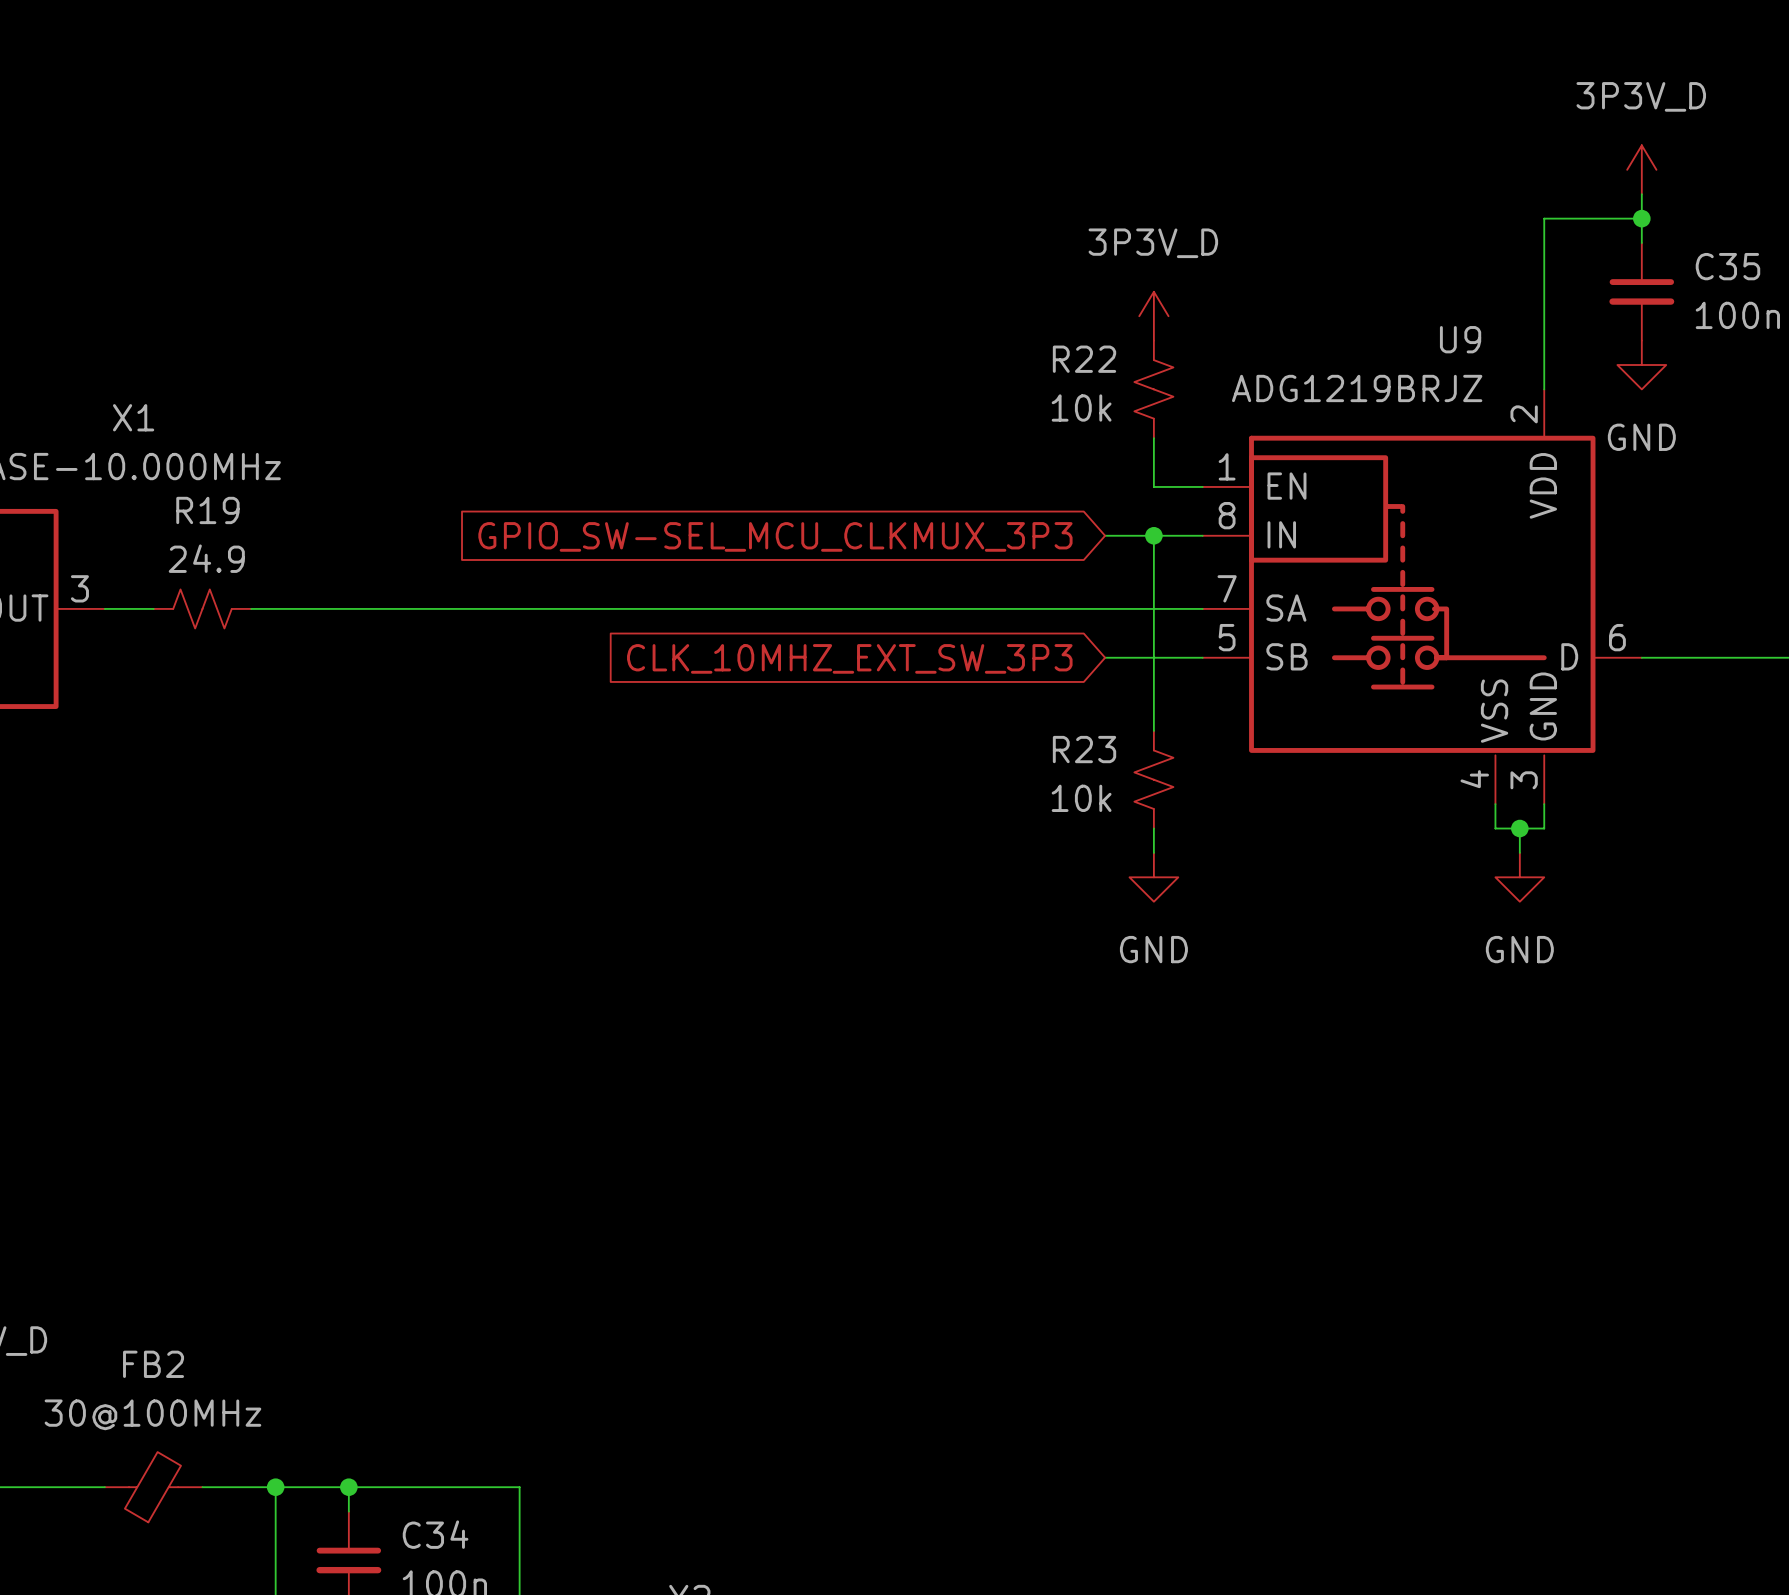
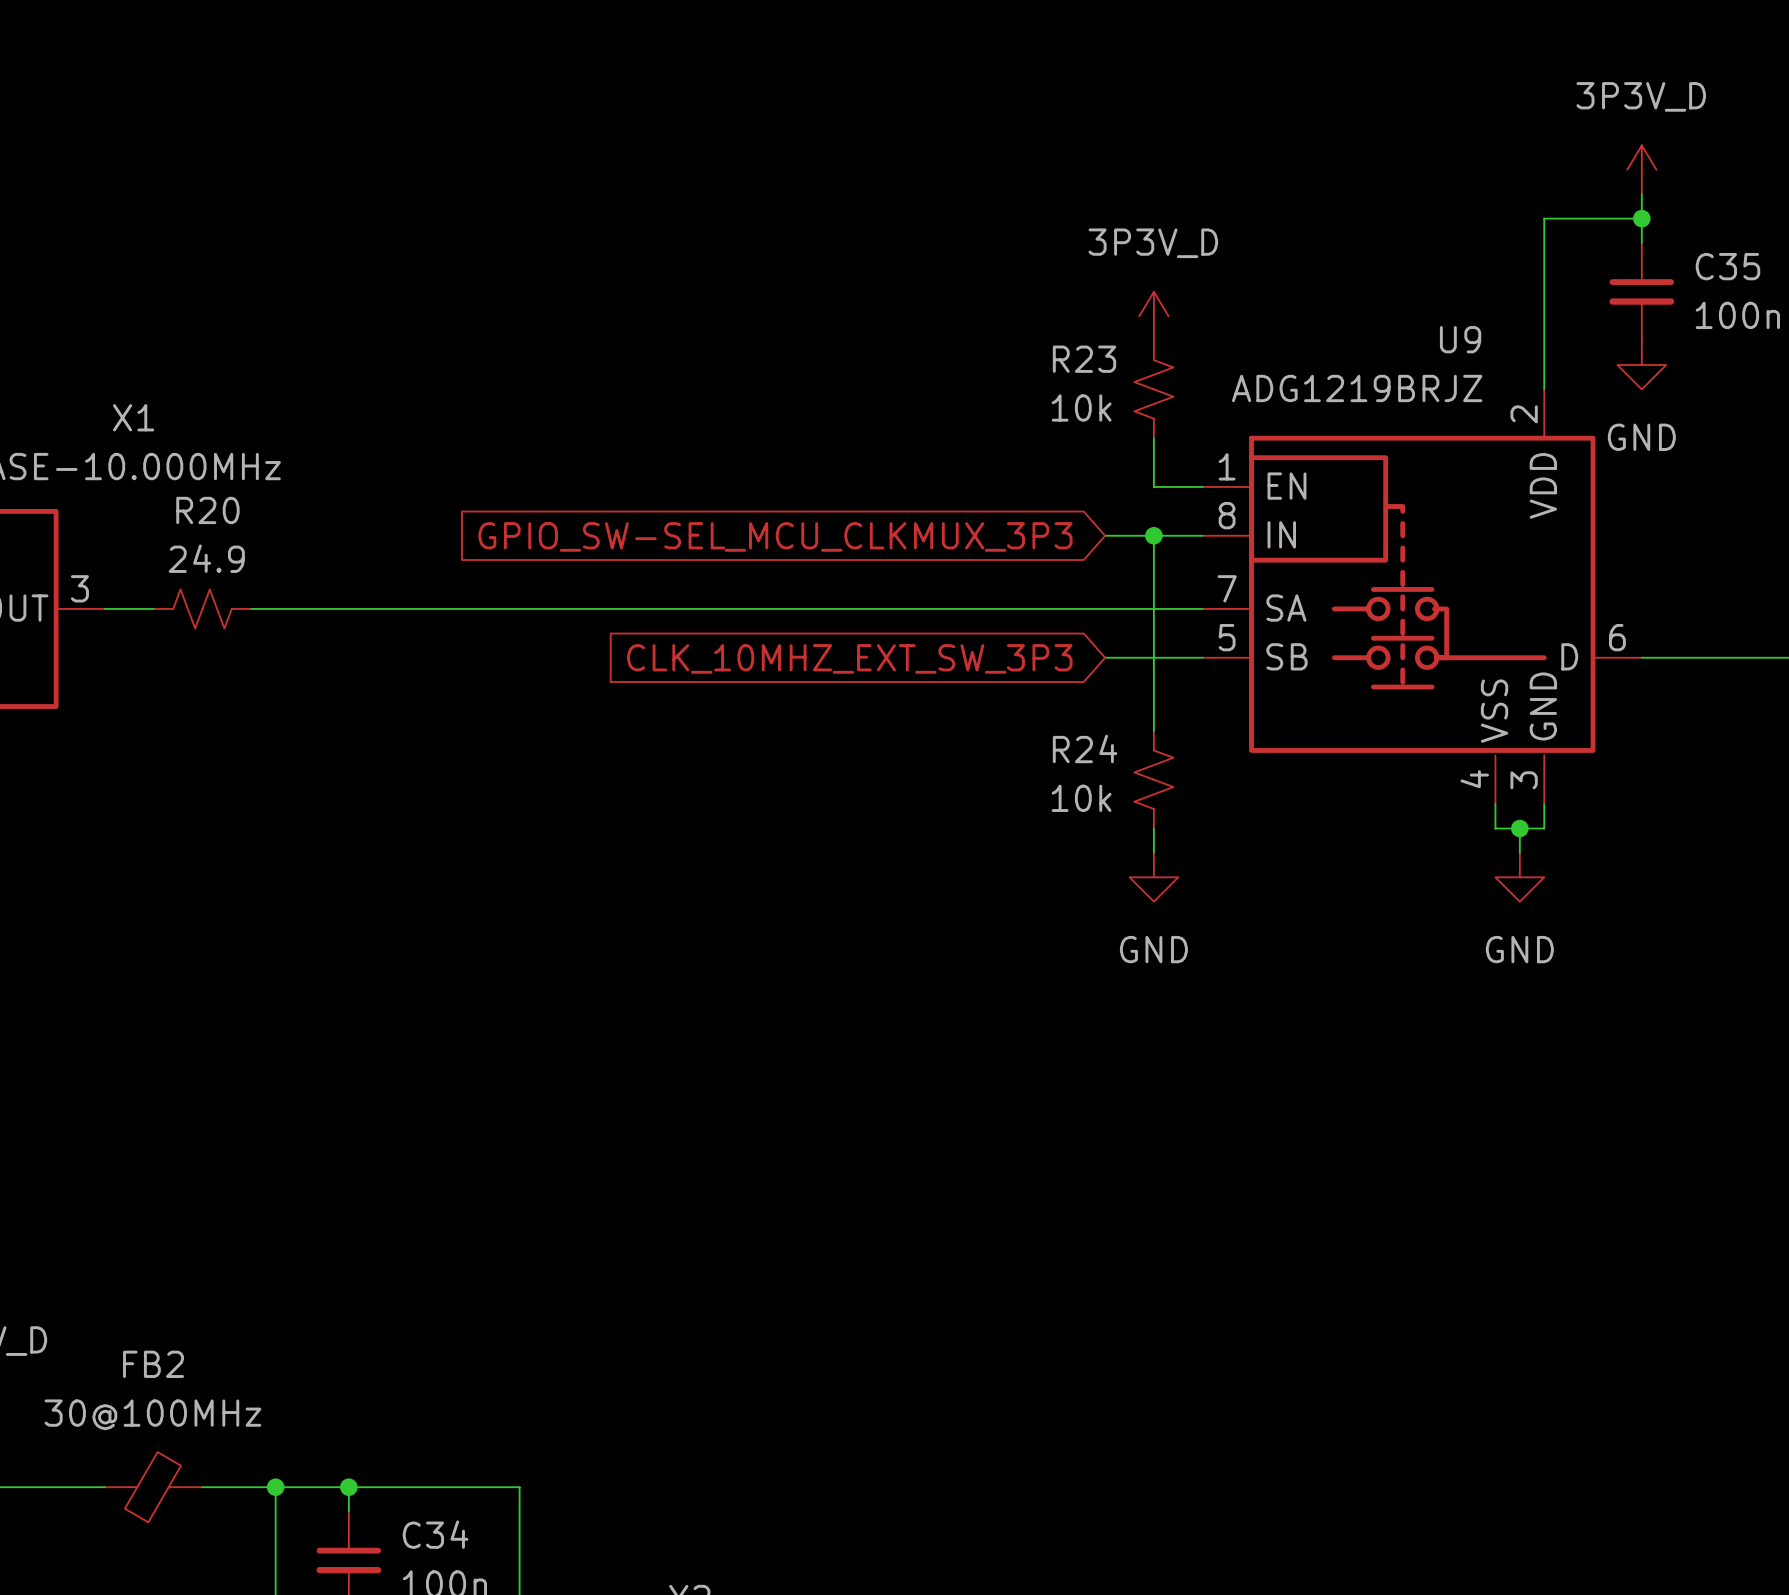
R22 name: R22 (1084, 359) -> R23 (1084, 359)
R19 name: R19 (207, 510) -> R20 (207, 510)
R23 name: R23 (1084, 749) -> R24 (1085, 748)

